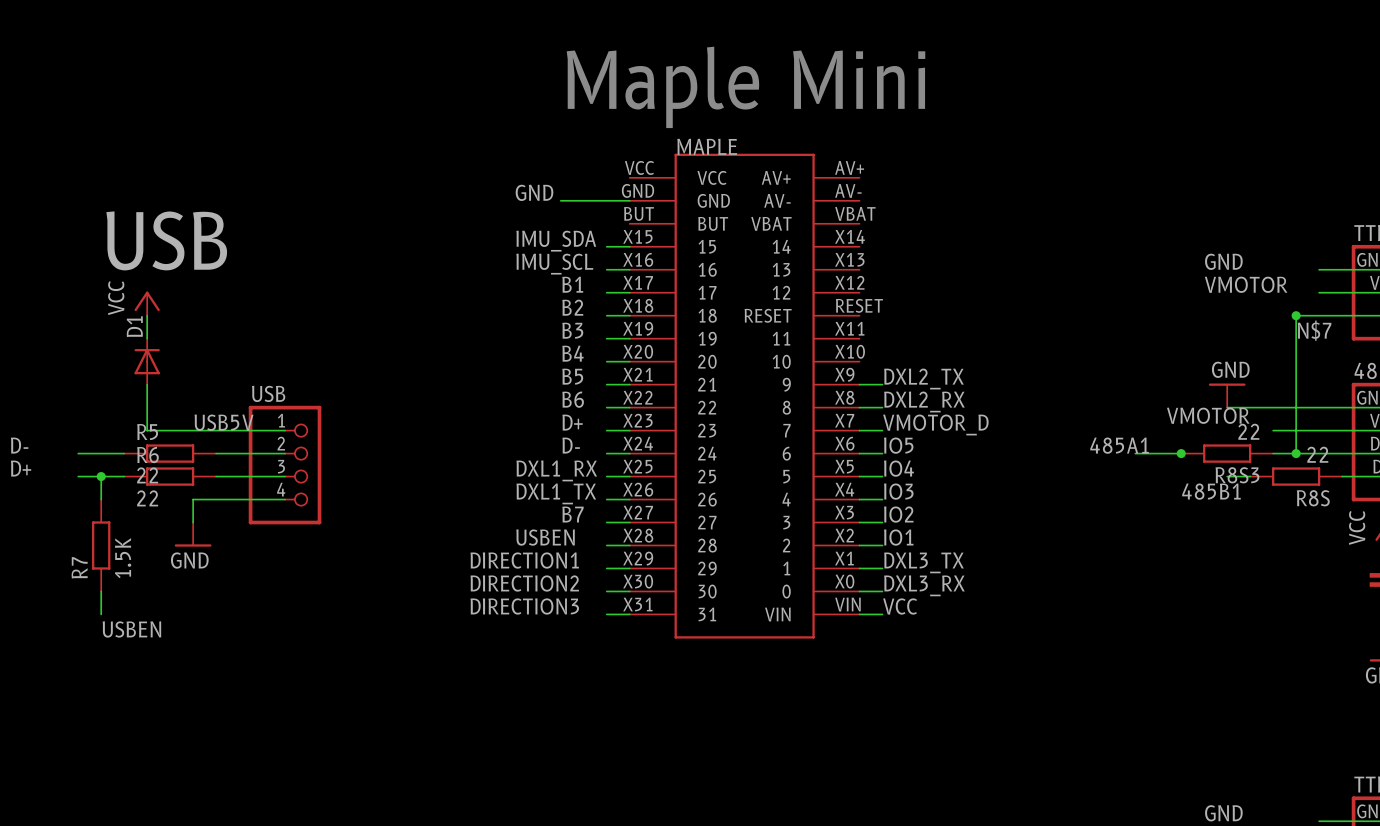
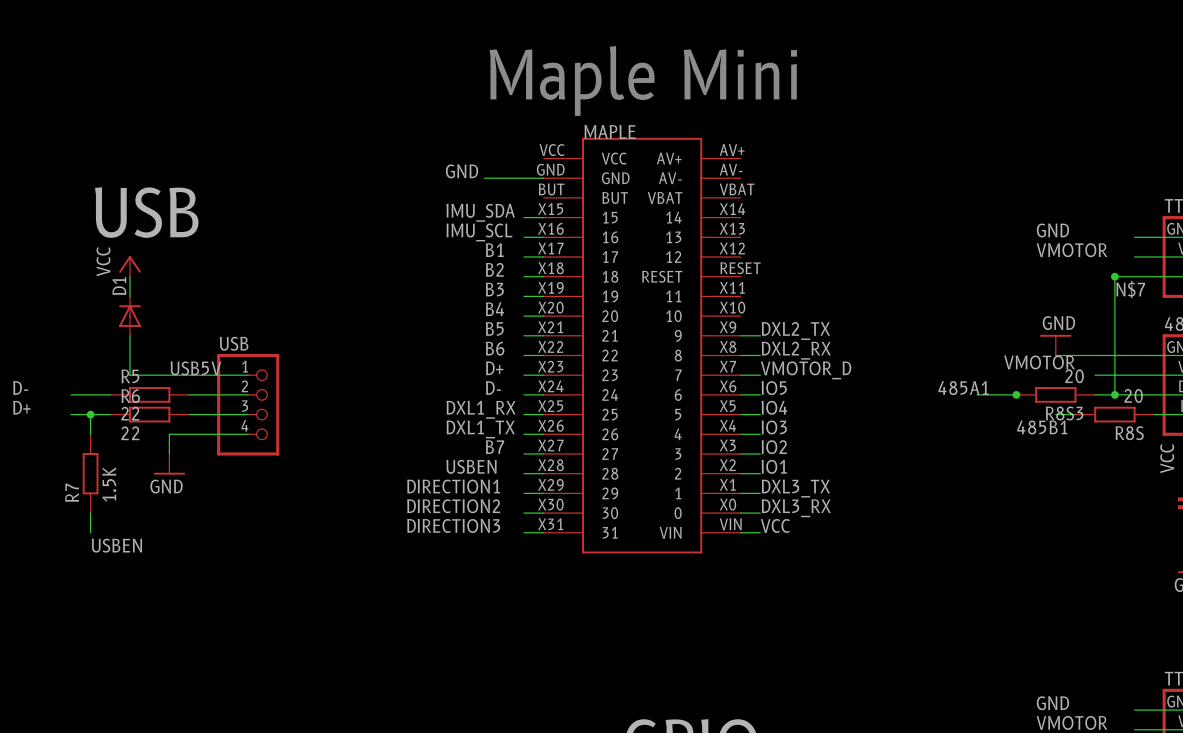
R8S3 value: 22 (1248, 431) -> 20 (1074, 376)
R8S value: 22 (1317, 454) -> 20 (1133, 395)

